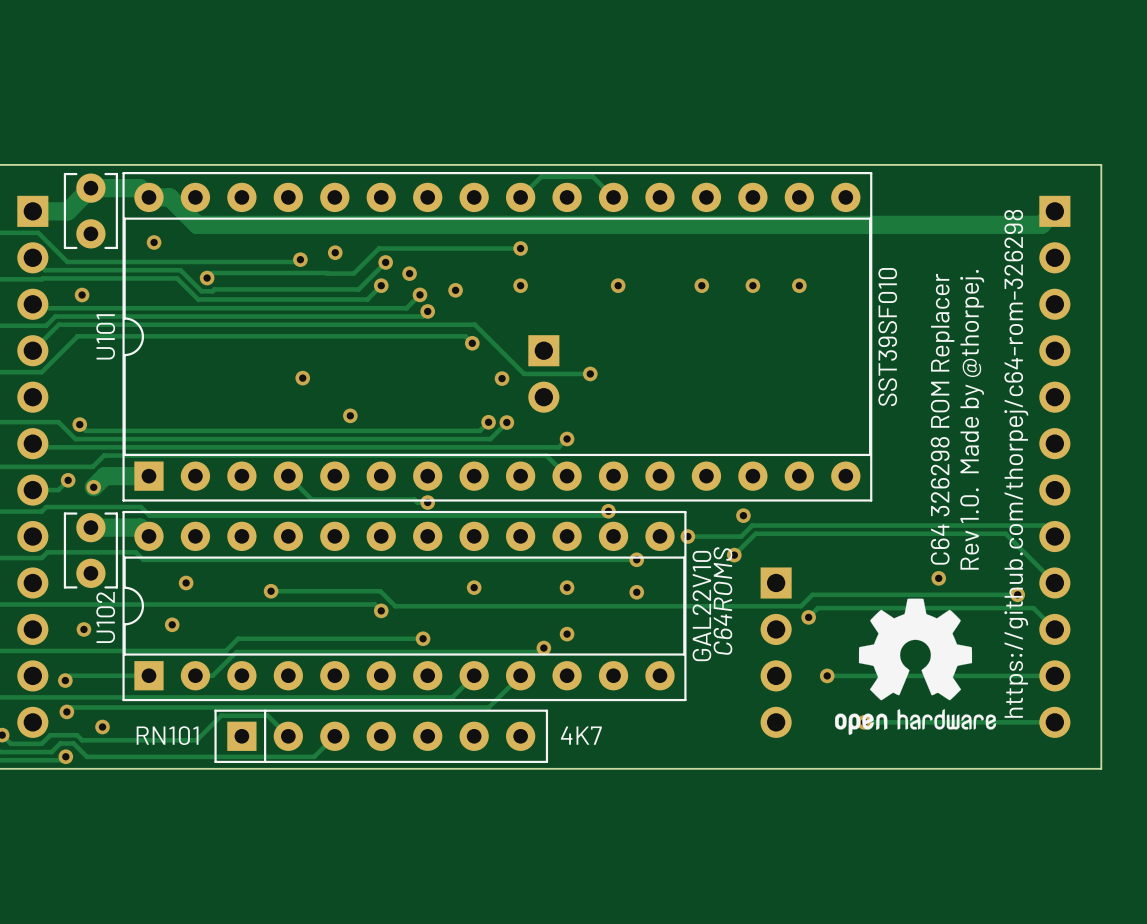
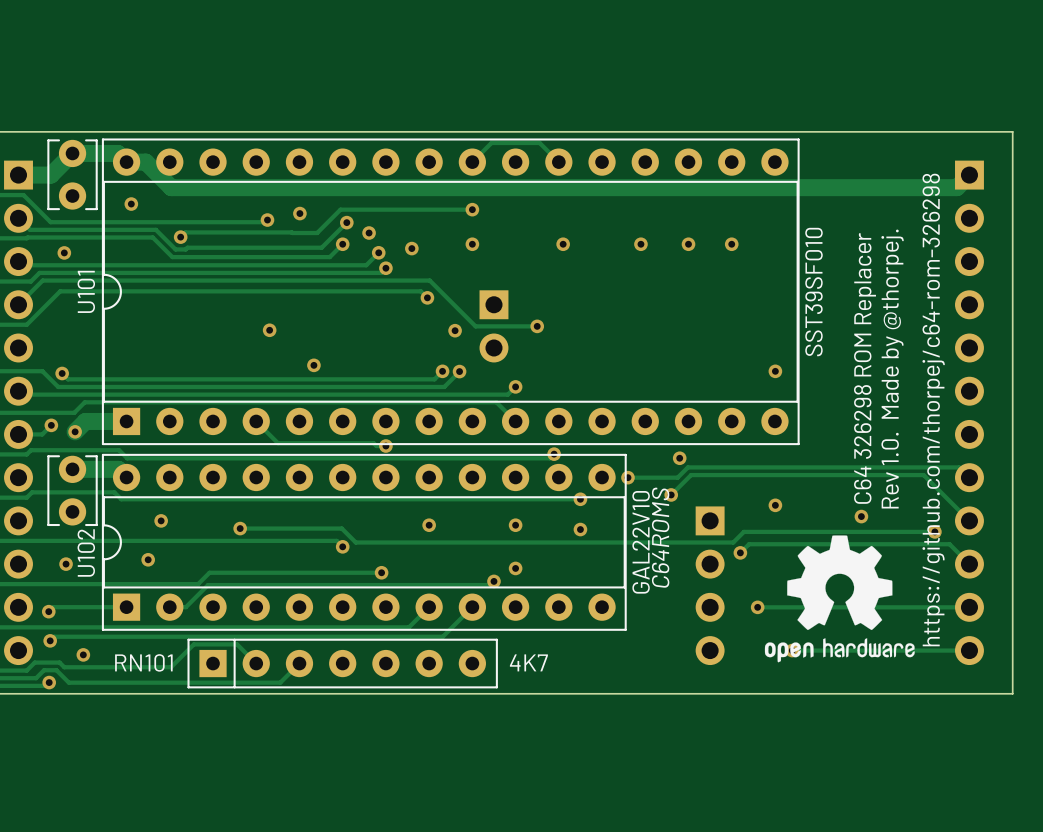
via: none -> (775, 371)
via: none -> (775, 505)

